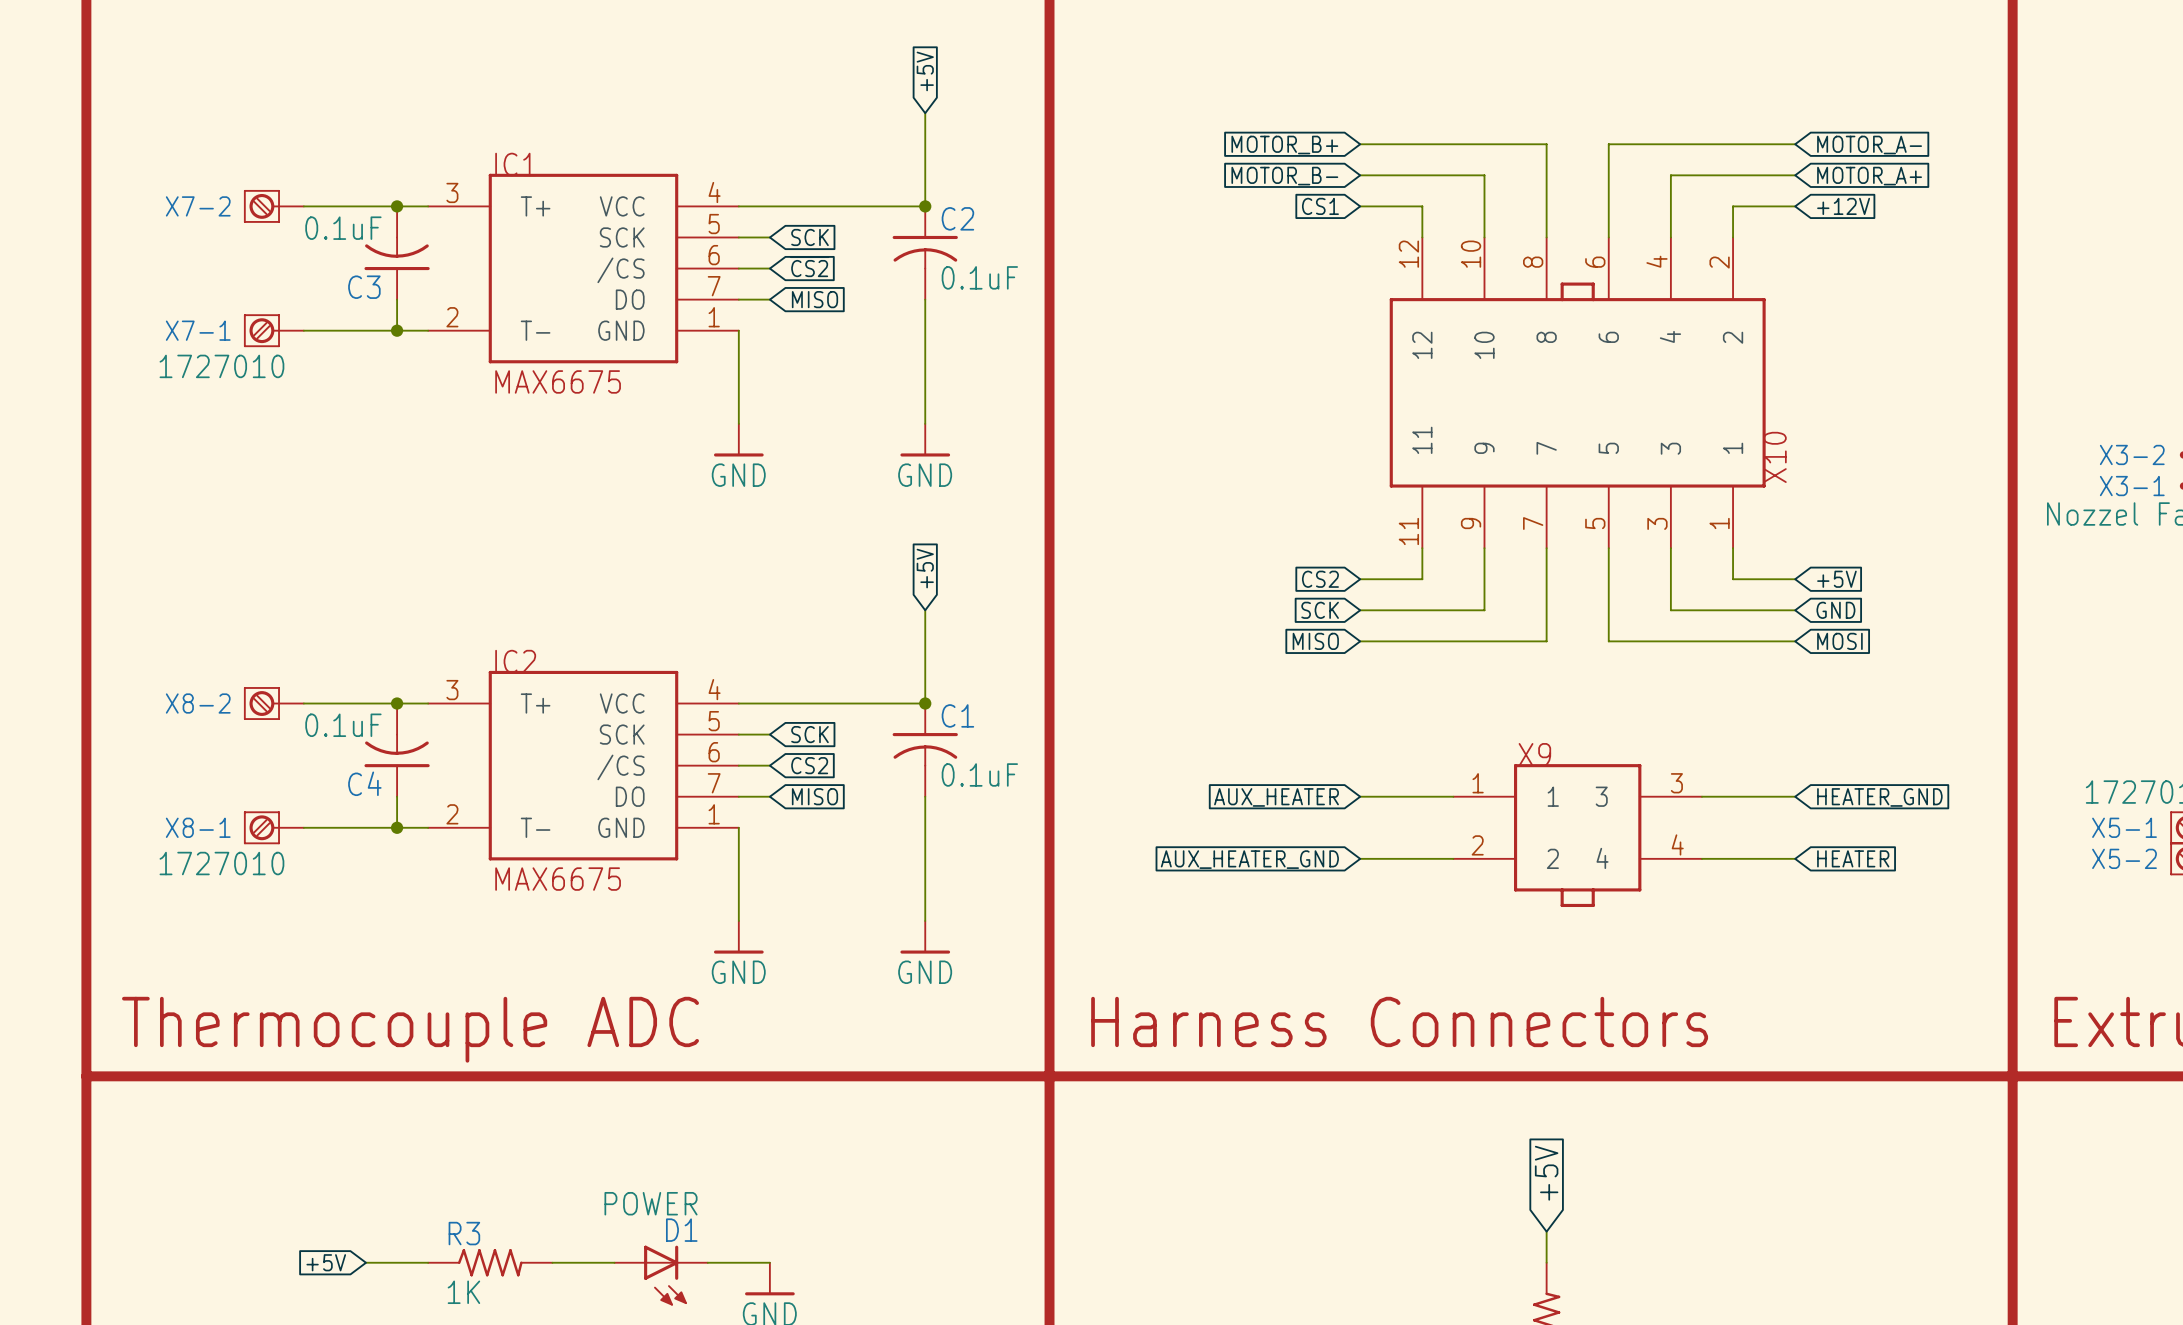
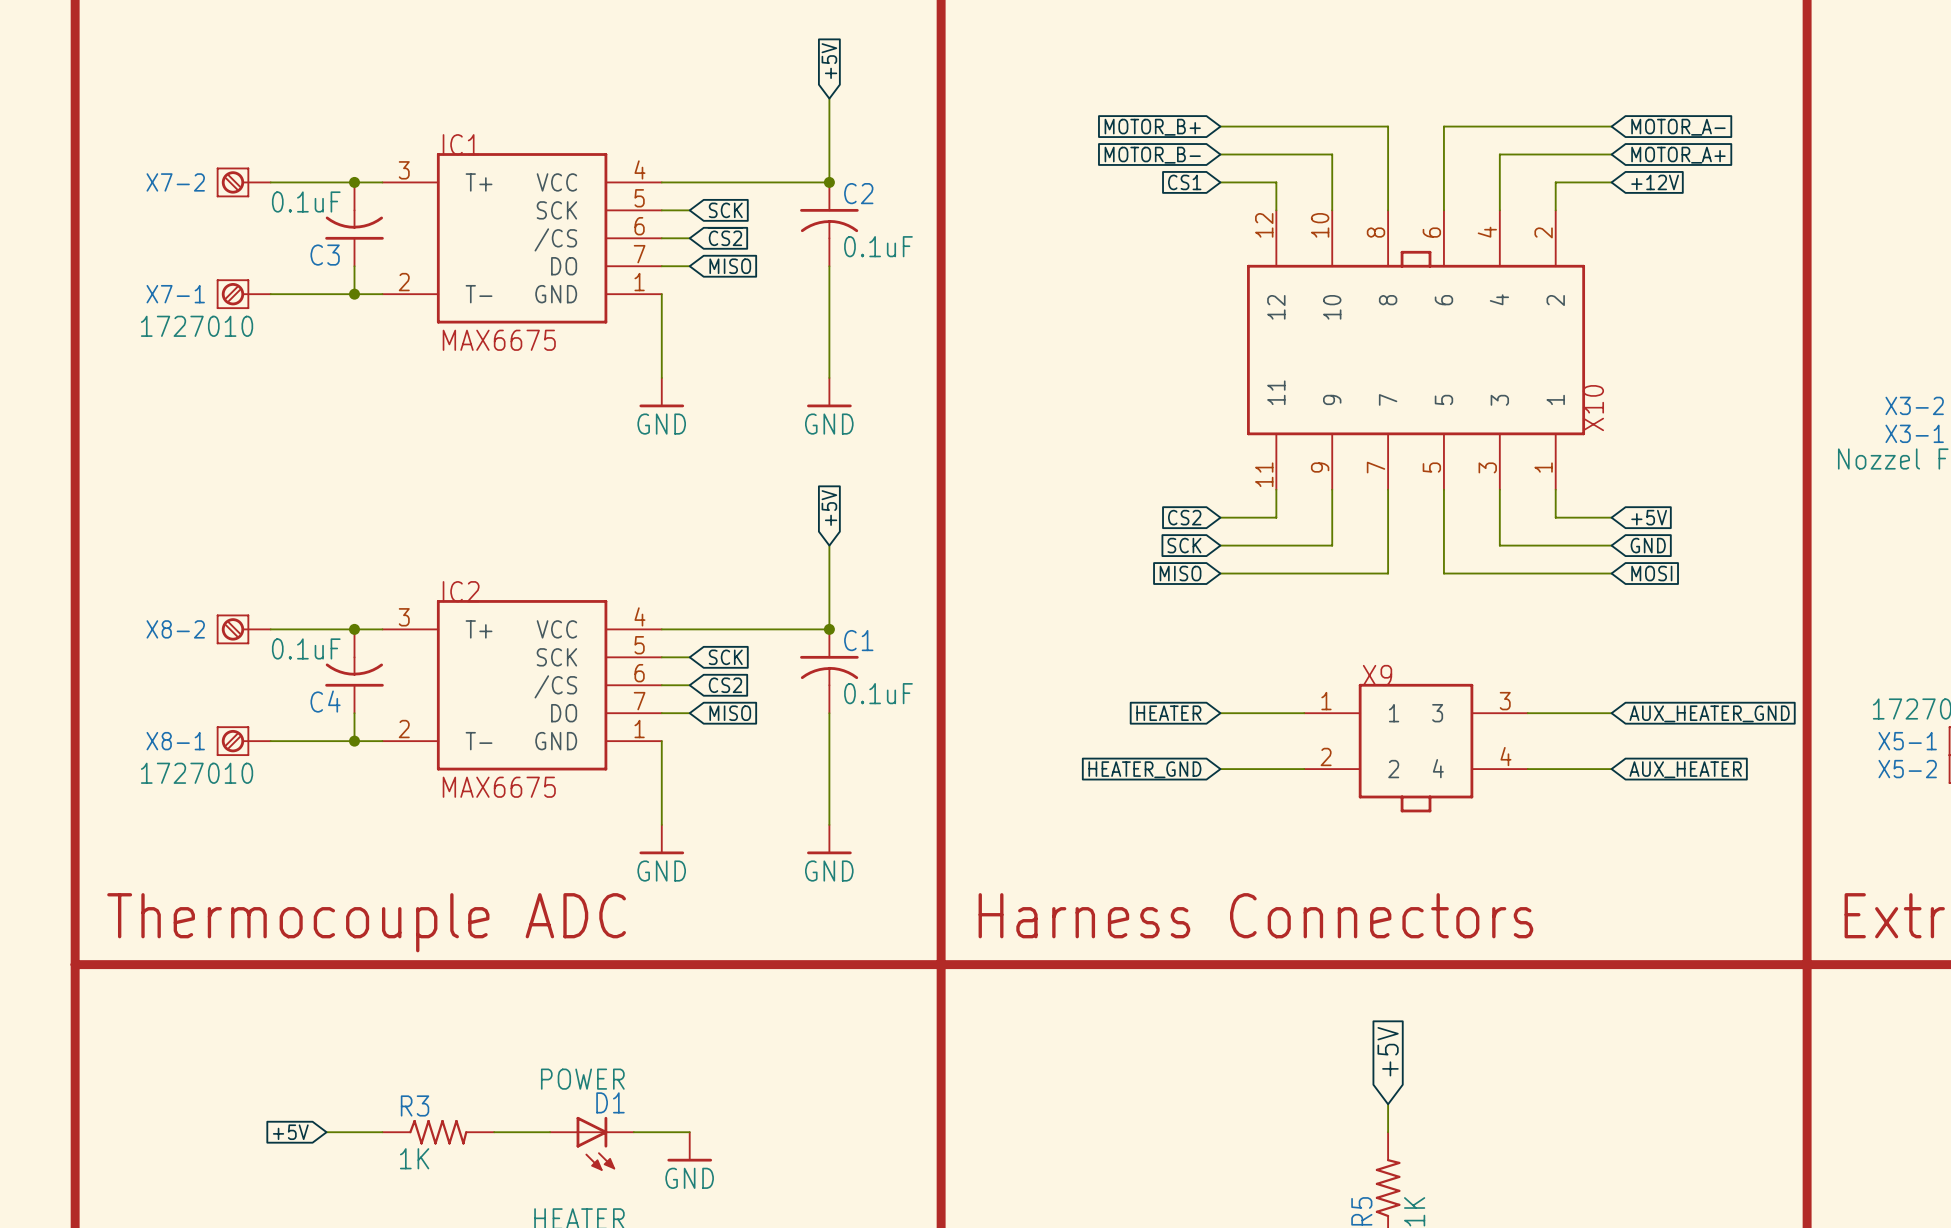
global label: AUX_HEATER (1276, 797) -> HEATER (1168, 713)
global label: HEATER_GND (1879, 797) -> AUX_HEATER_GND (1709, 713)
global label: HEATER (1853, 858) -> AUX_HEATER (1685, 769)
global label: AUX_HEATER_GND (1249, 859) -> HEATER_GND (1144, 769)

